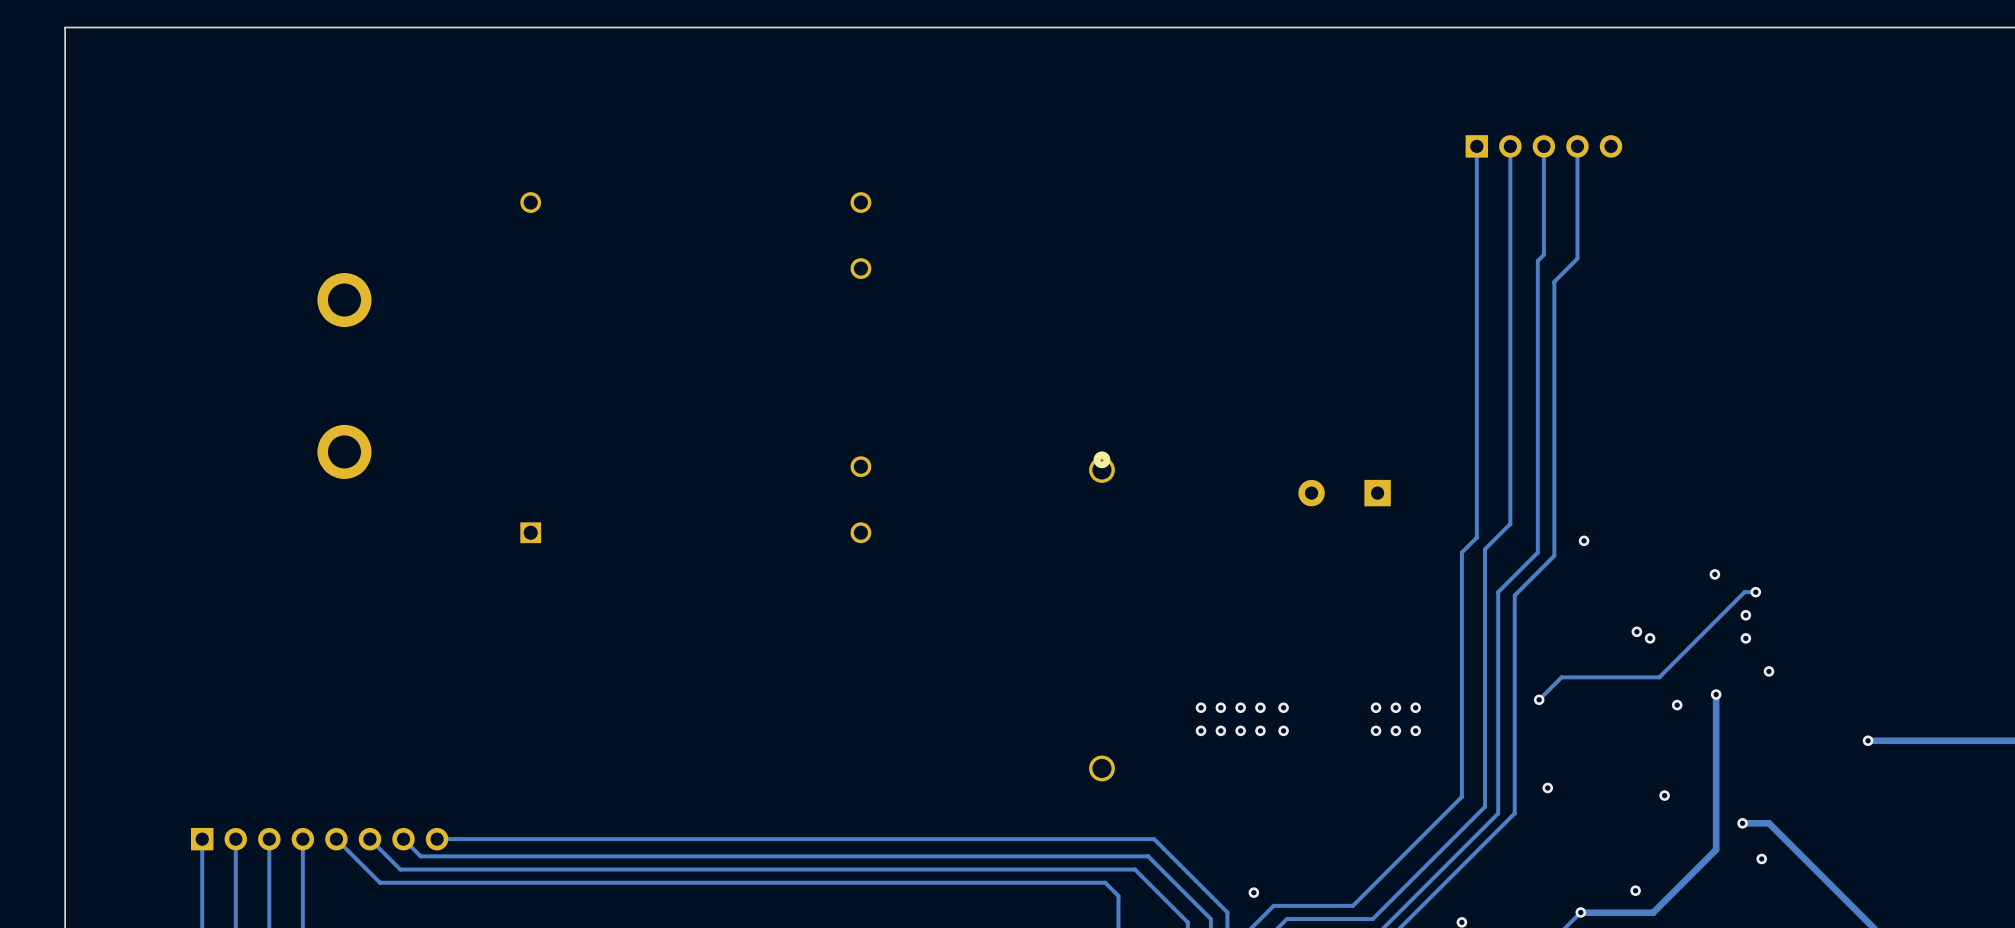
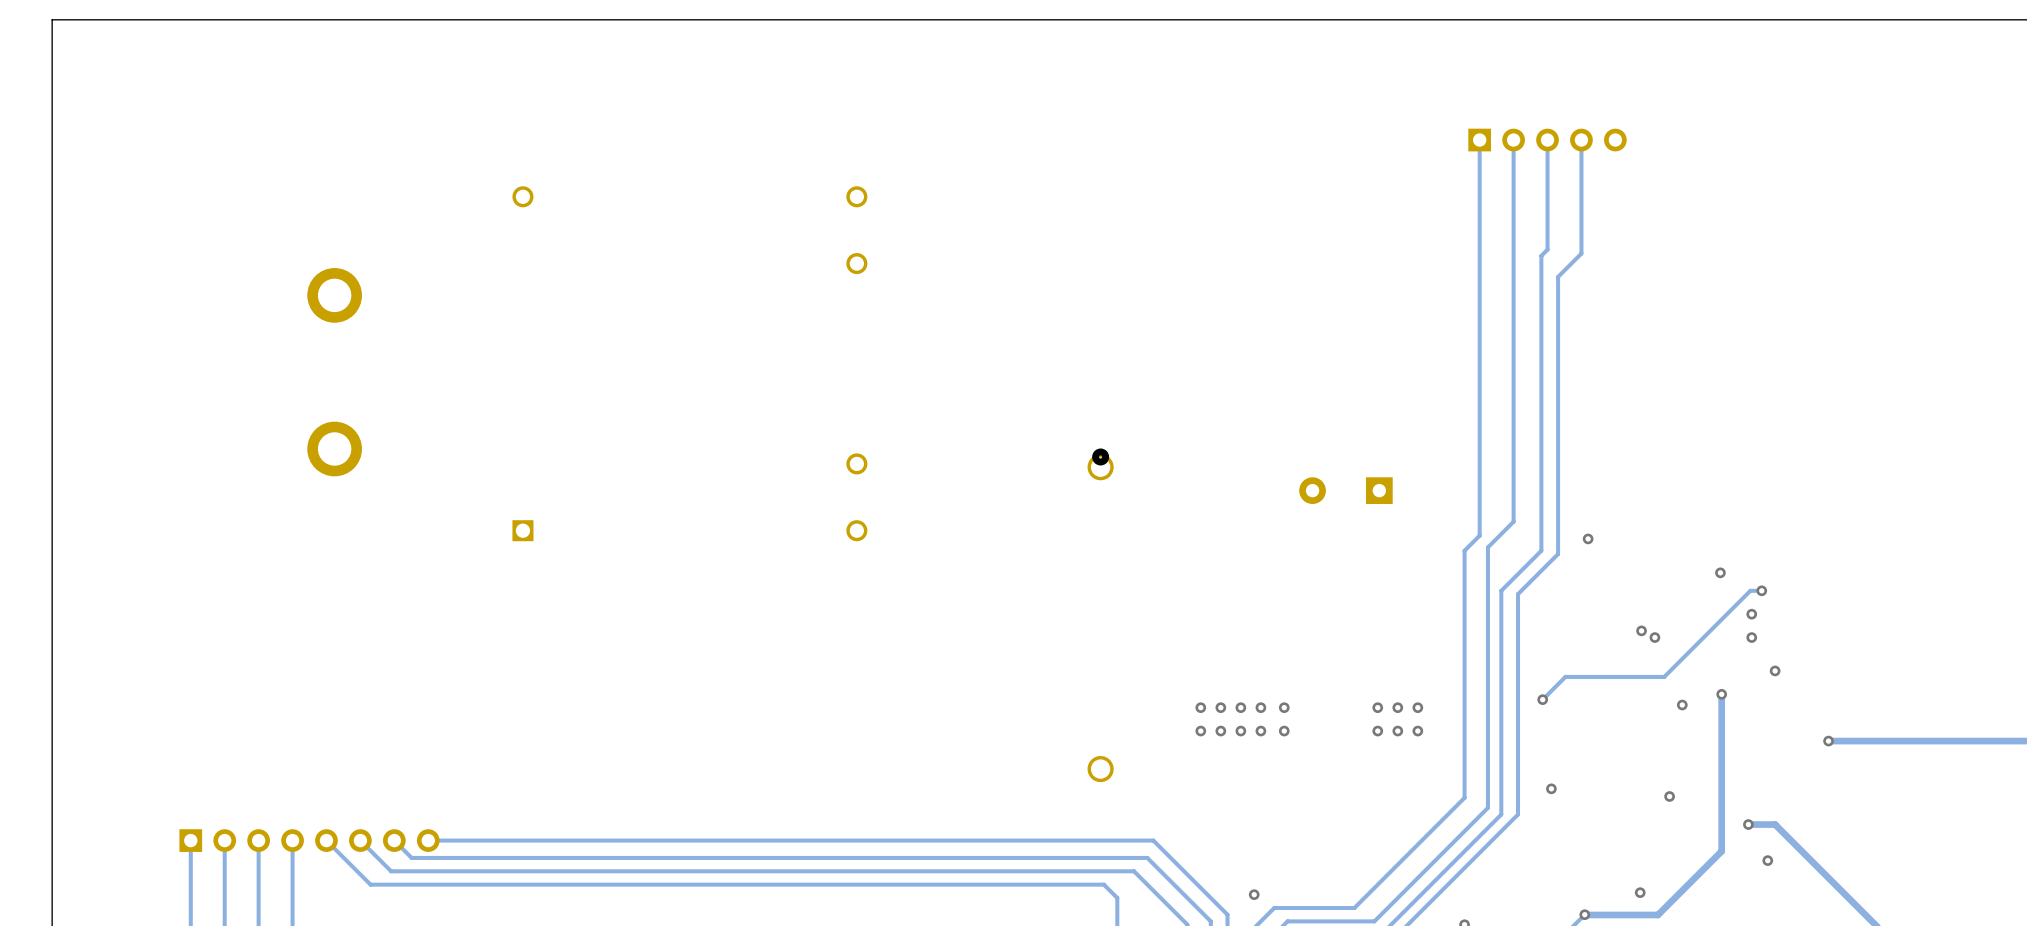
track: none -> (1875, 741) (1828, 741)
via position: (1868, 740) -> (1828, 741)

